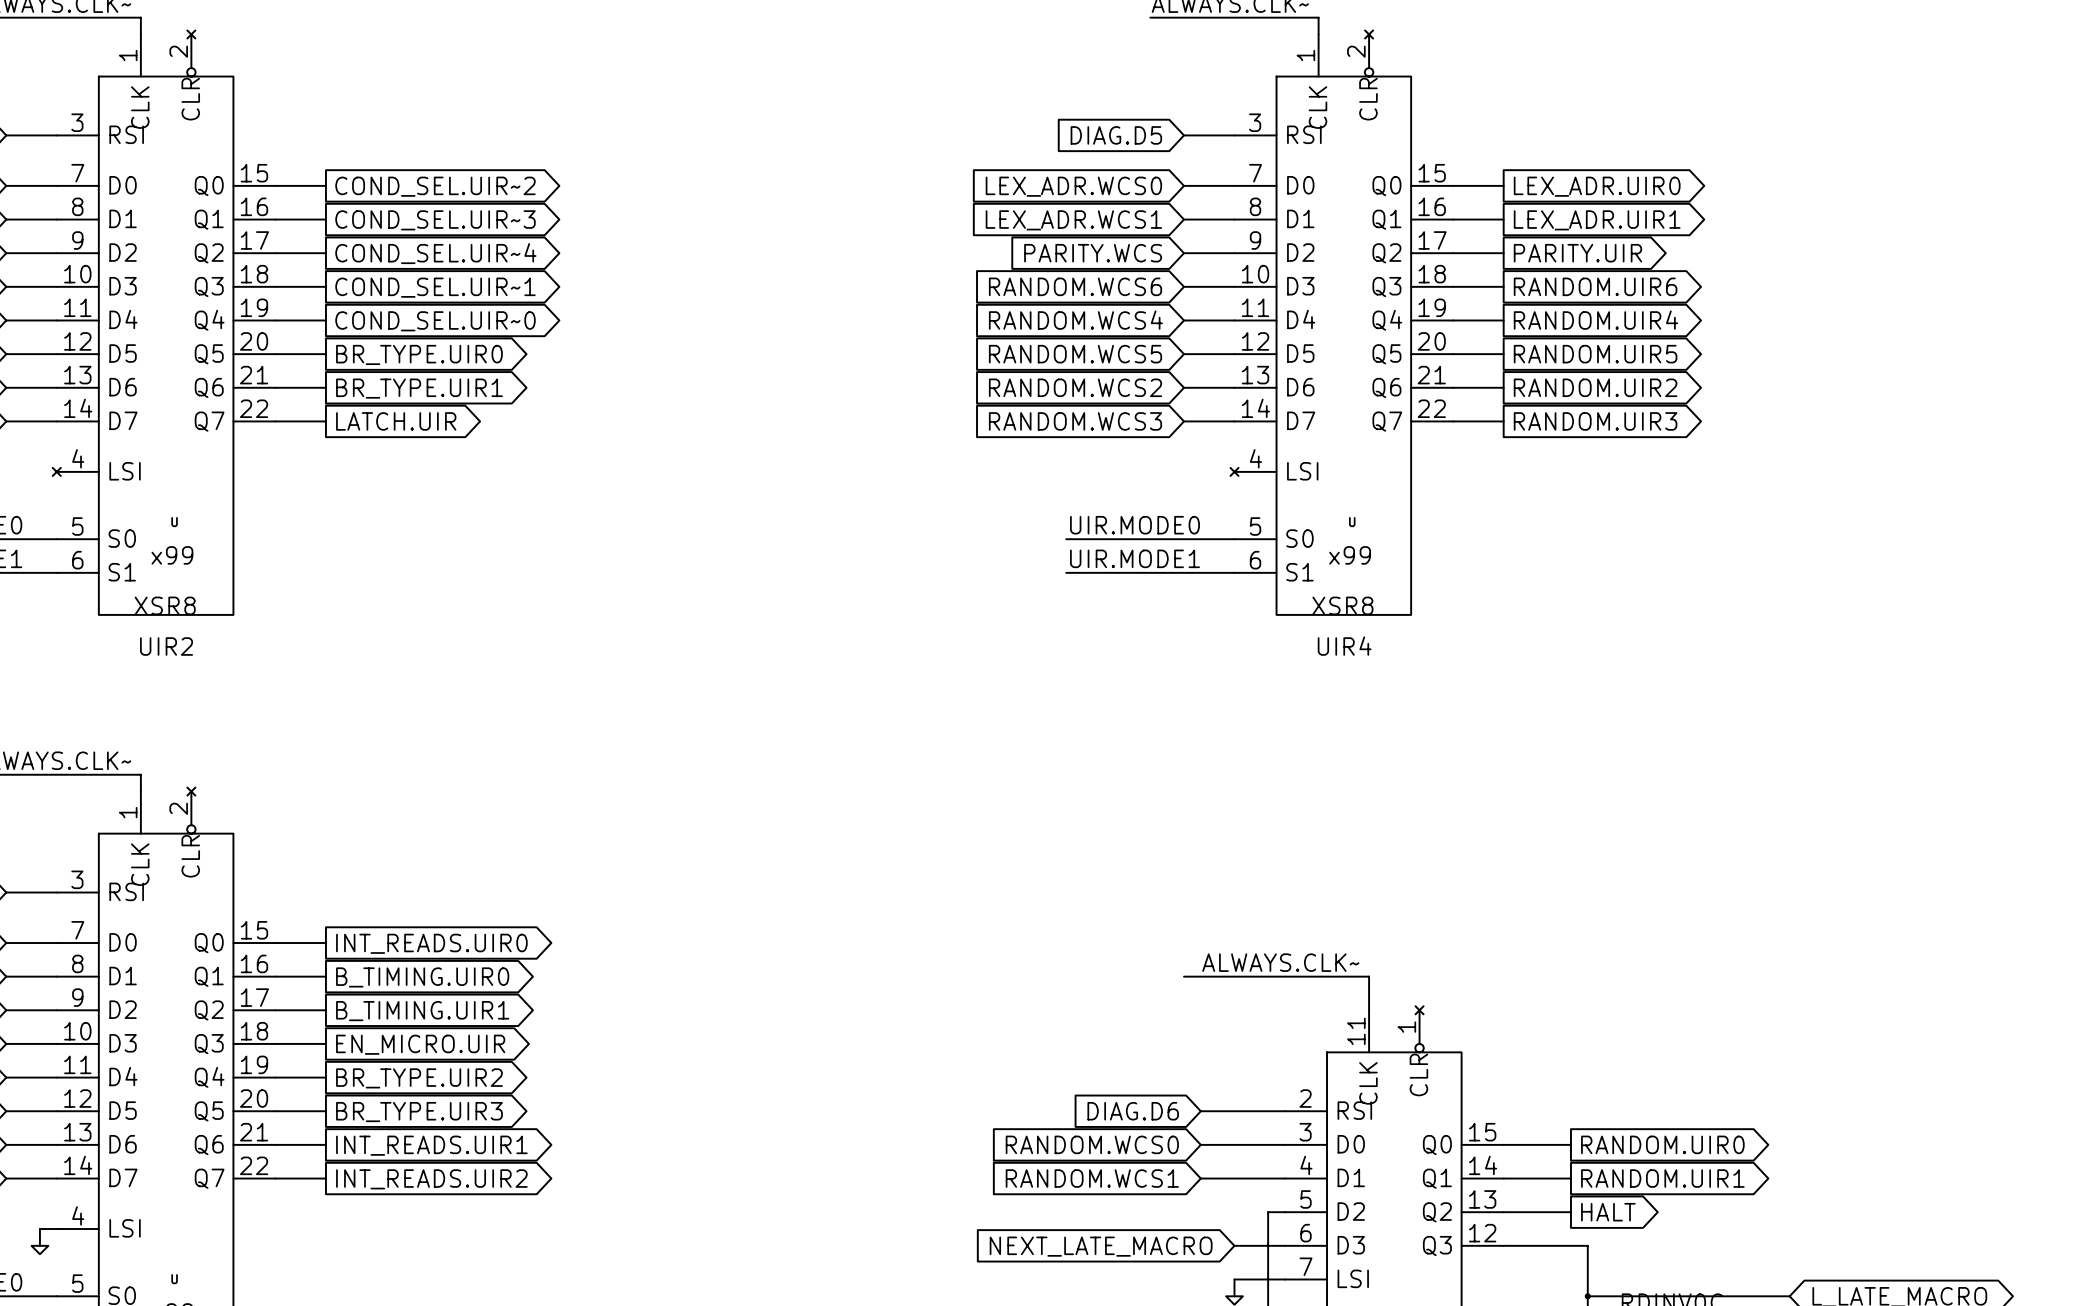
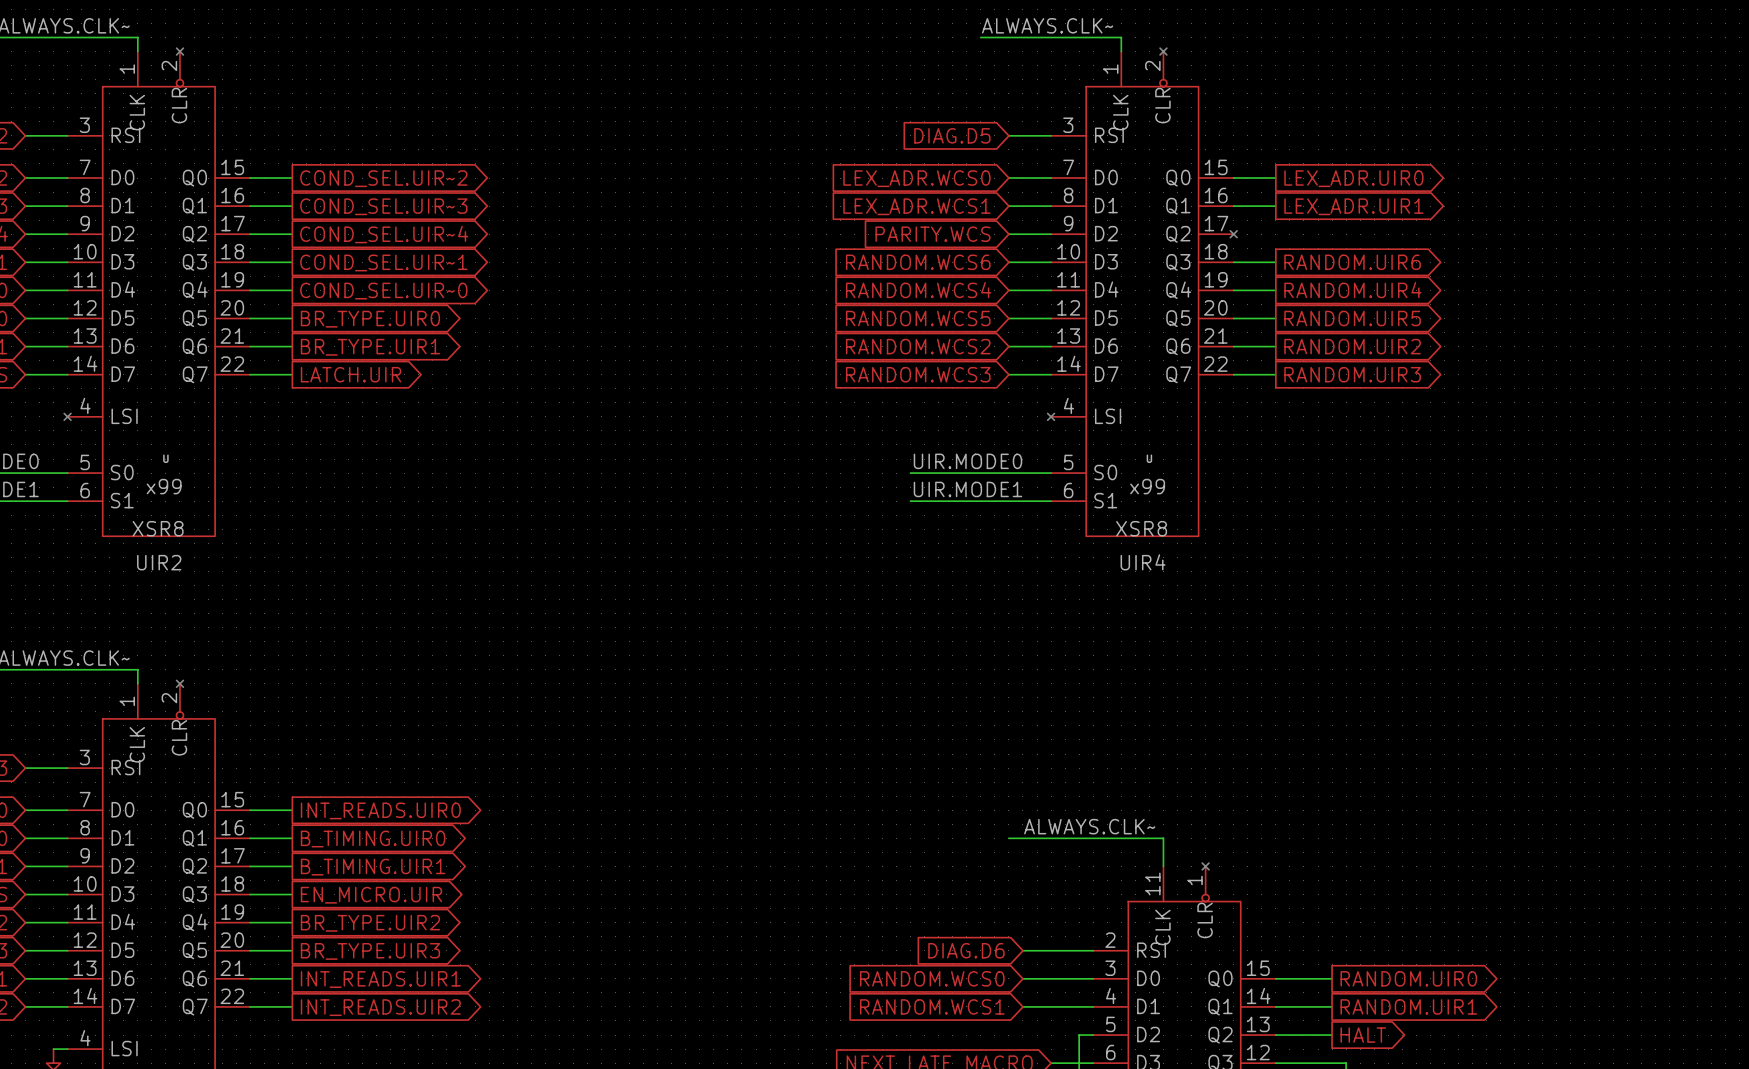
wire: (1453, 253) (1503, 253) -> none
no-connect mark: none -> (1233, 234)
global label: PARITY.UIR (1577, 253) -> none

